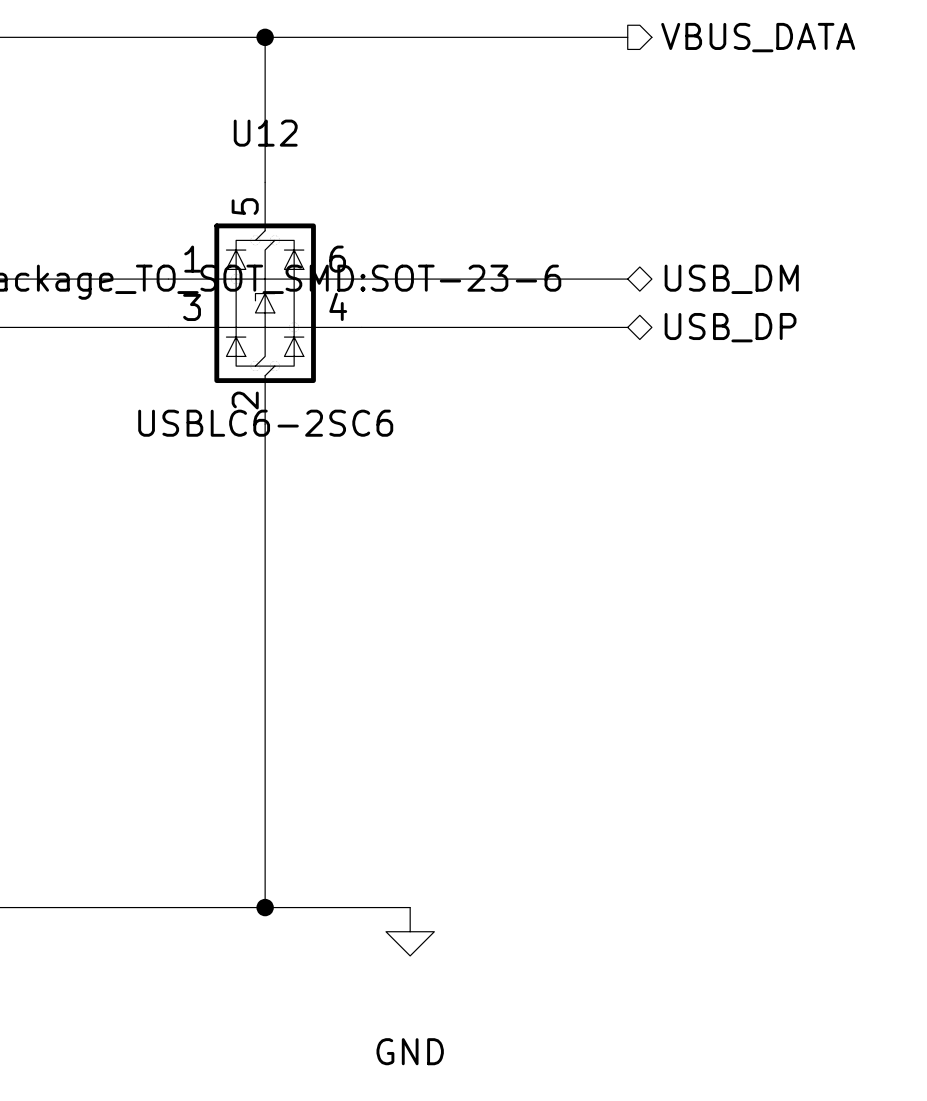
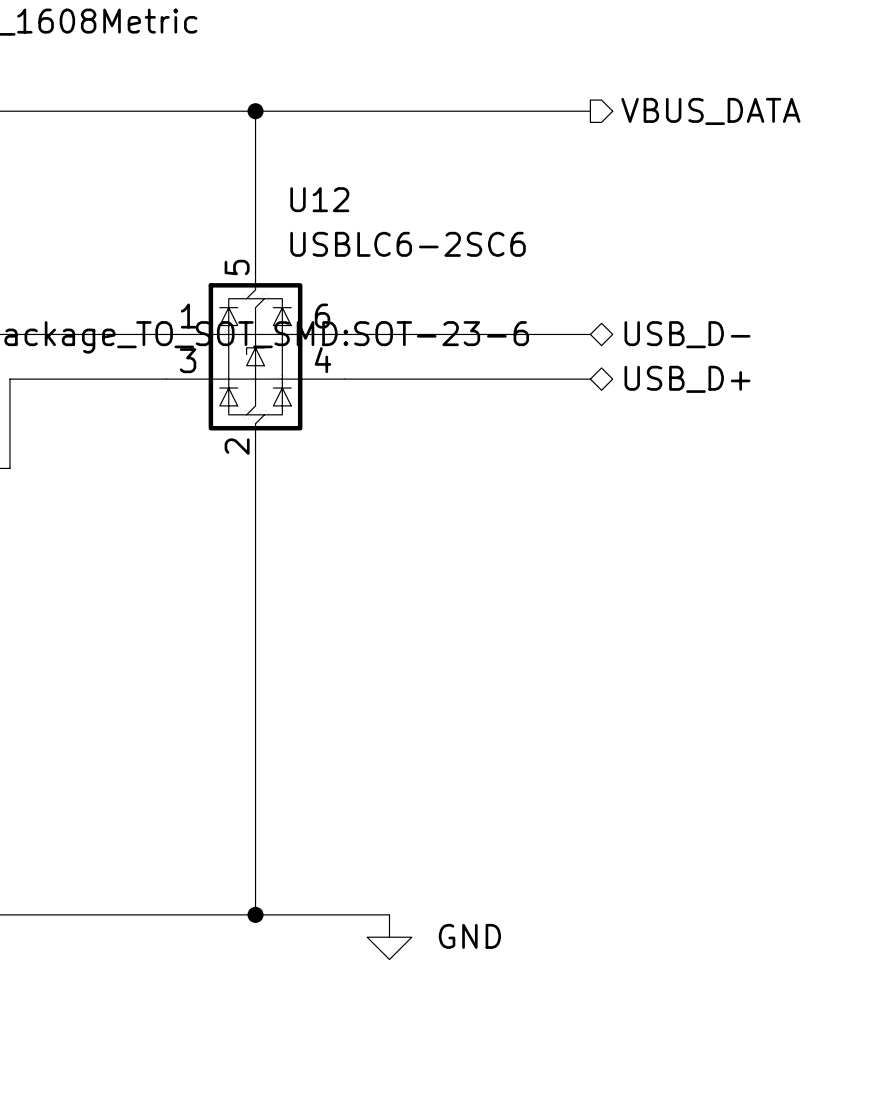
U12 name position: U12 (265, 133) -> U12 (319, 199)
hierarchical label: USB_DM (731, 279) -> USB_D- (687, 334)
hierarchical label: USB_DP (730, 327) -> USB_D+ (687, 379)
U12 value position: USBLC6-2SC6 (265, 423) -> USBLC6-2SC6 (408, 244)
power symbol text position: GND (410, 1051) -> GND (469, 936)

